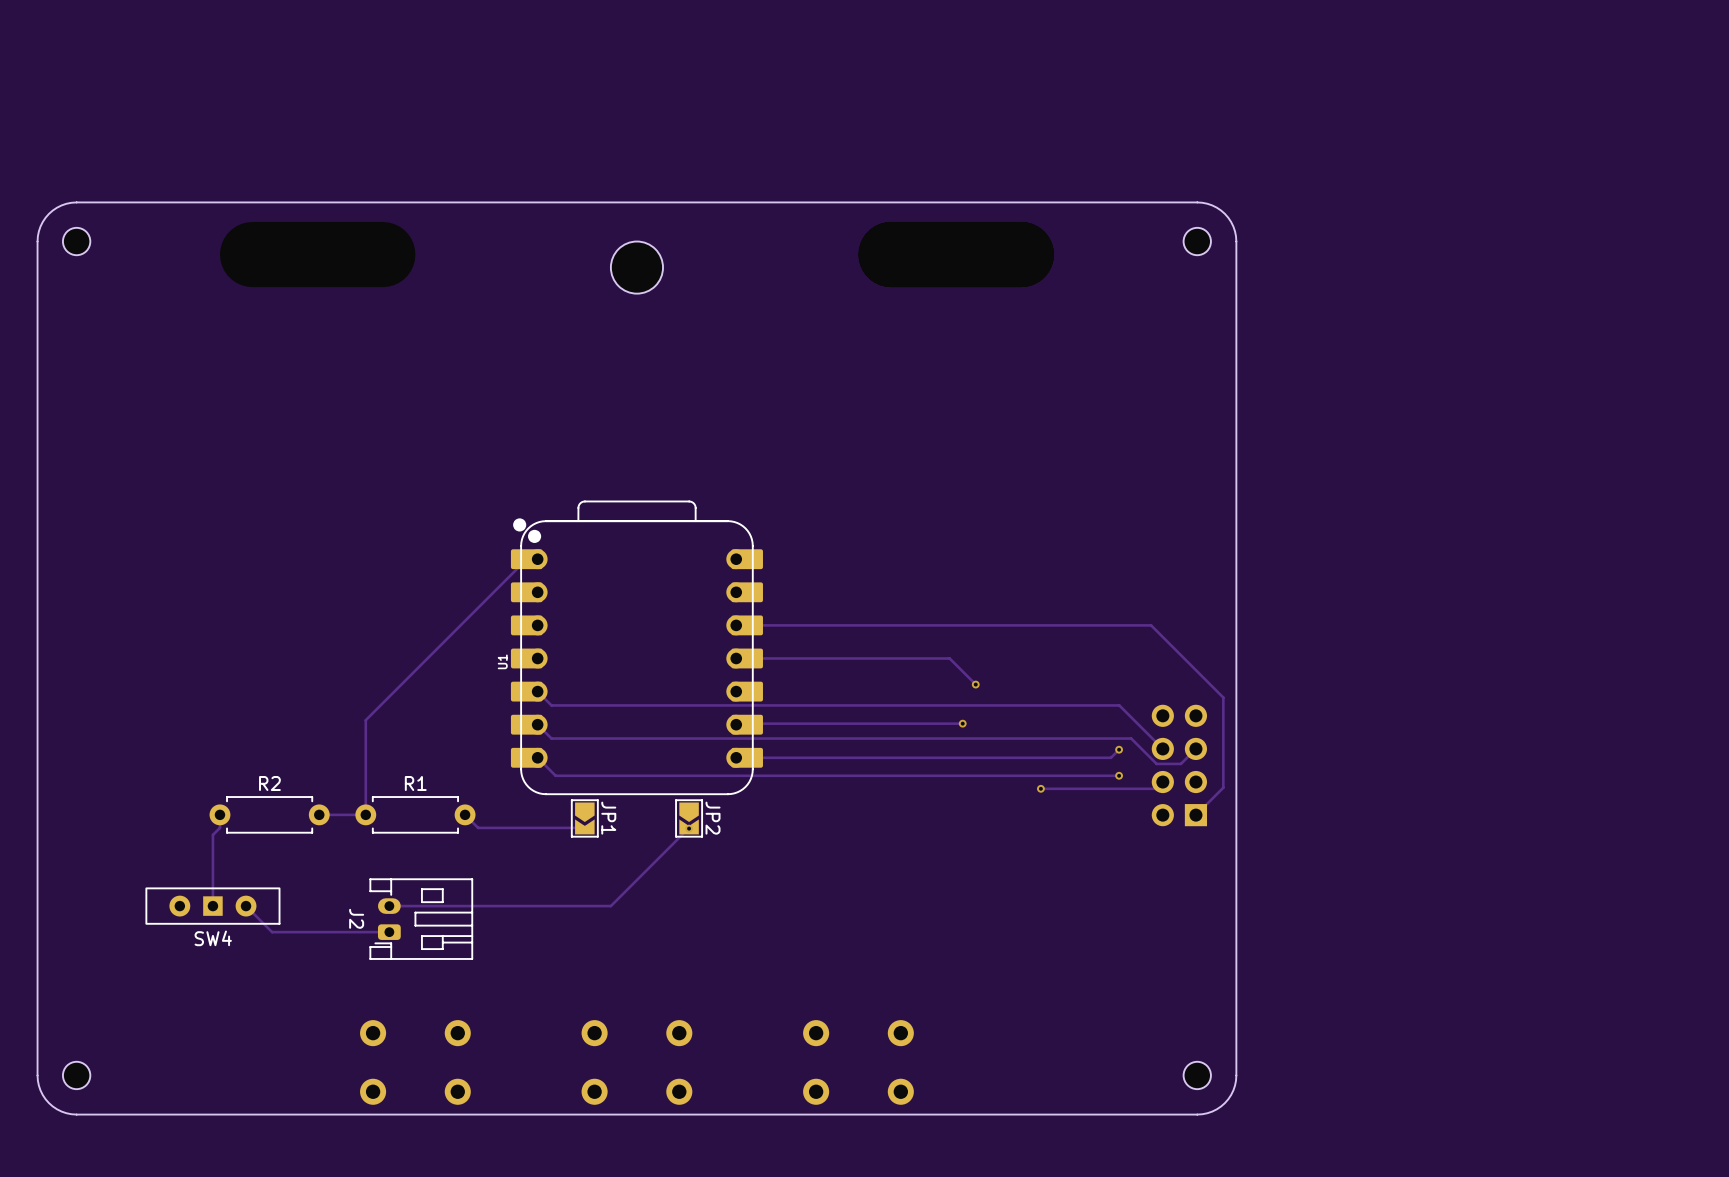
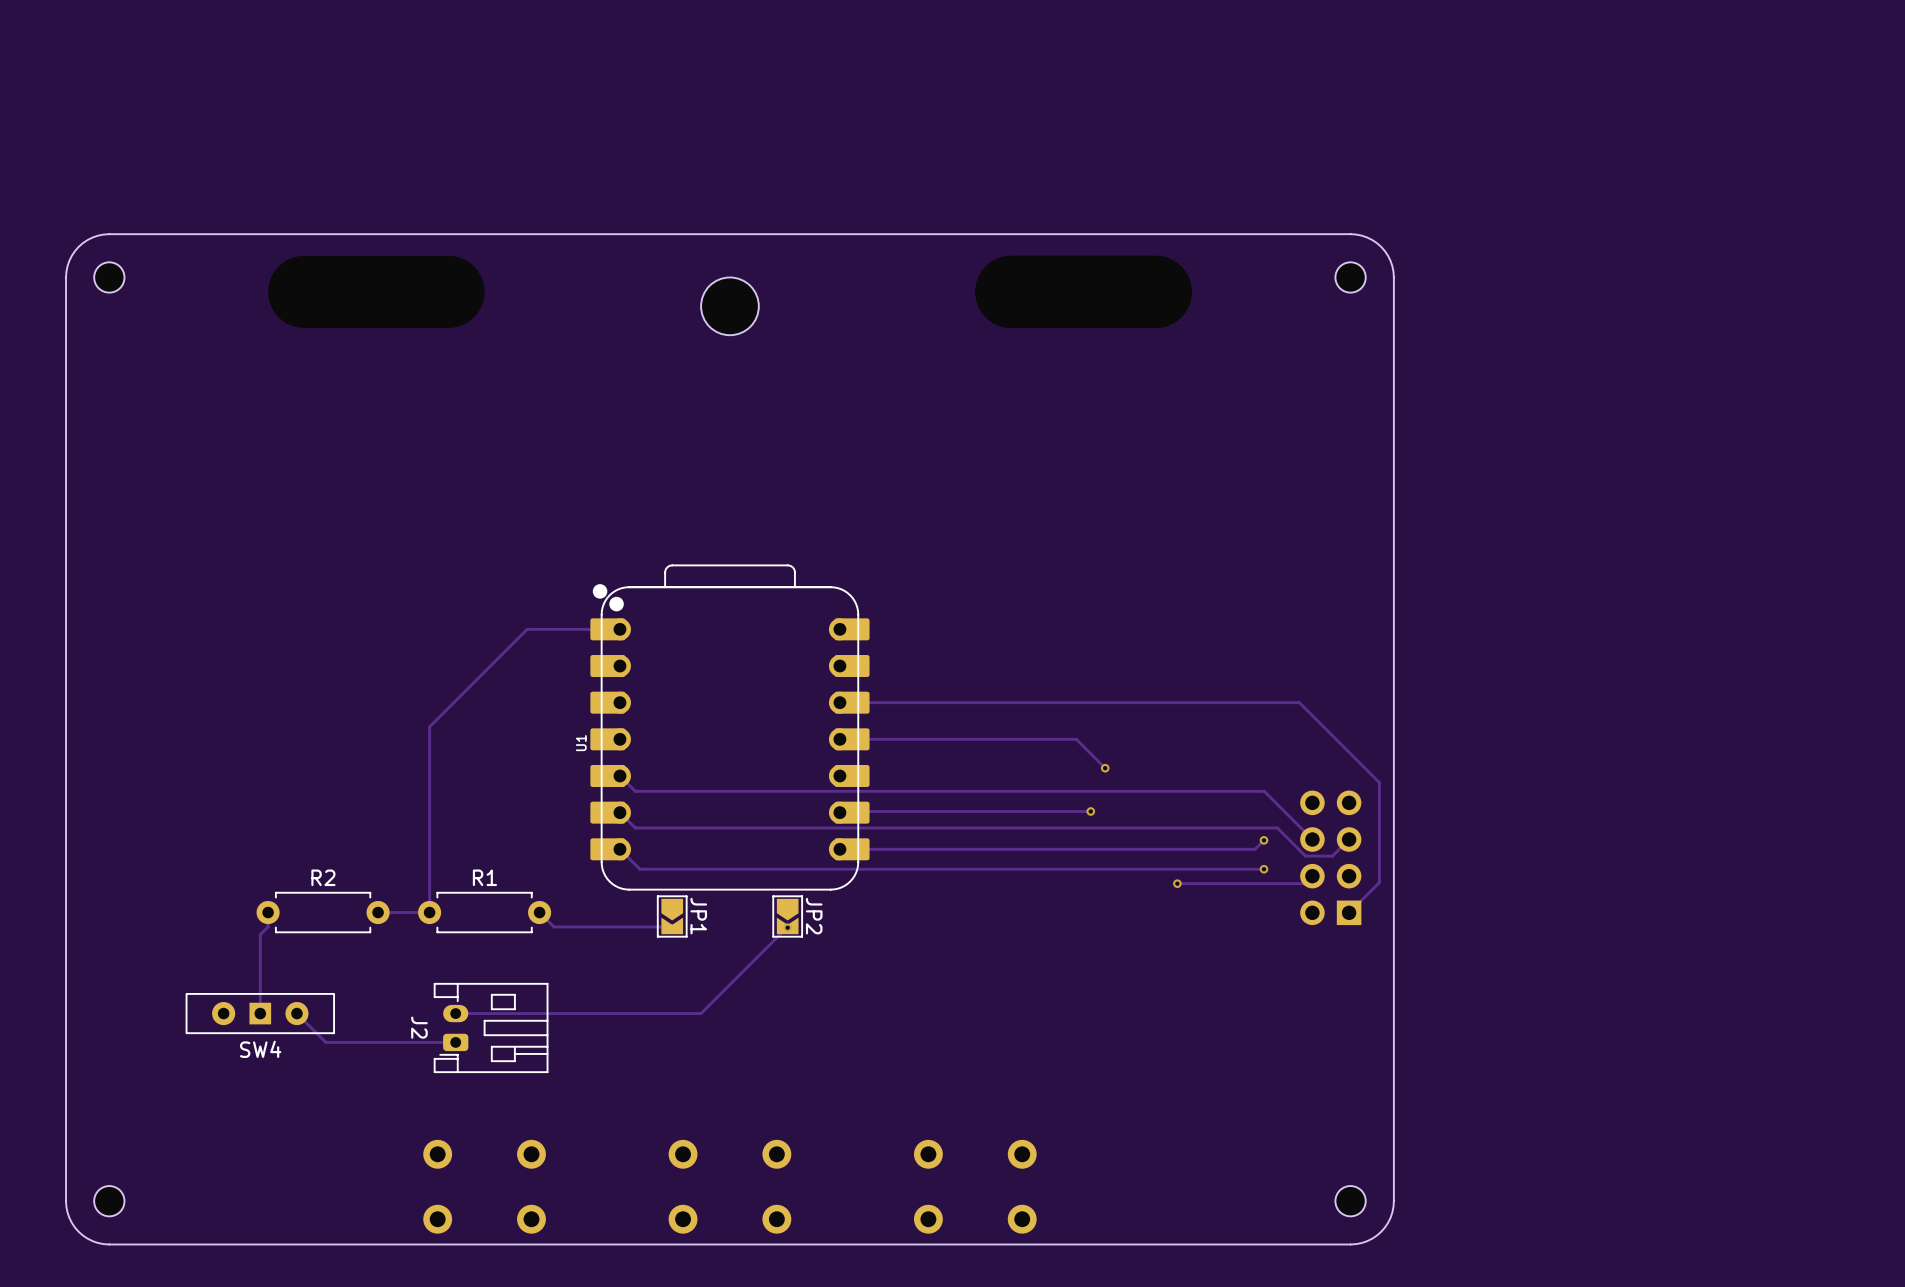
track: (526, 559) (365, 720) -> (607, 629) (527, 629) (429, 726) (429, 807)

